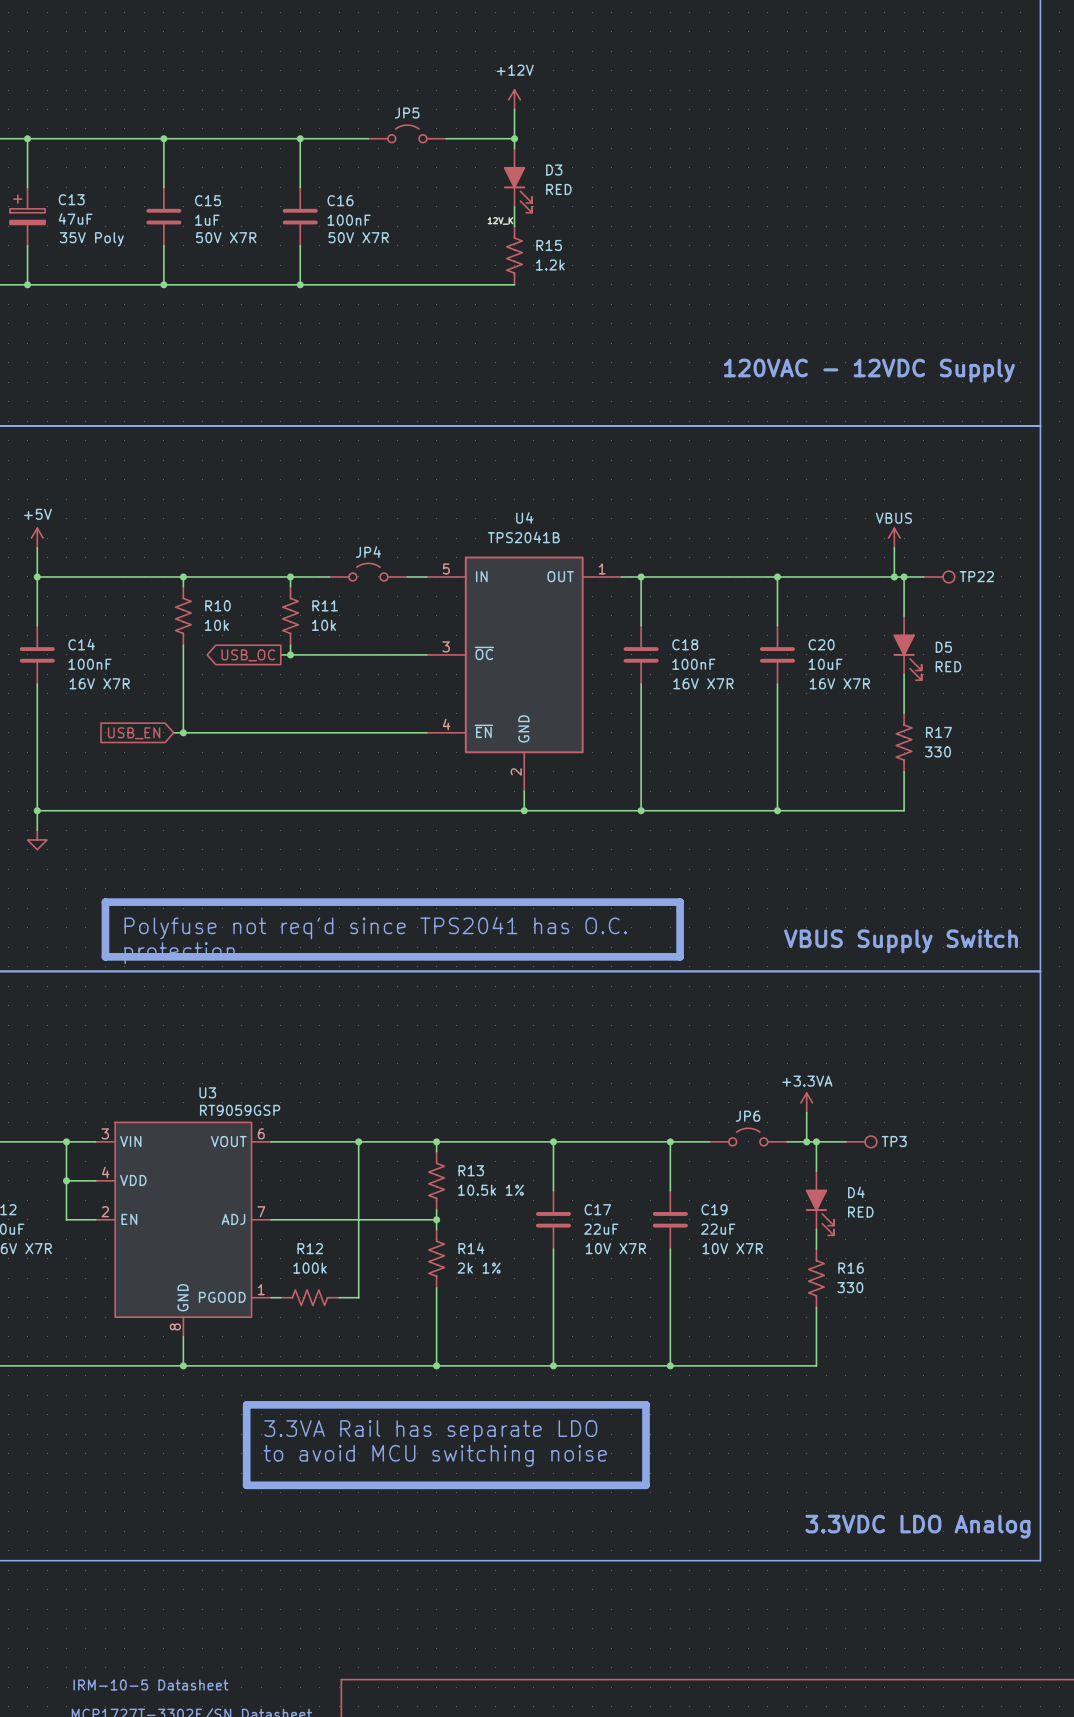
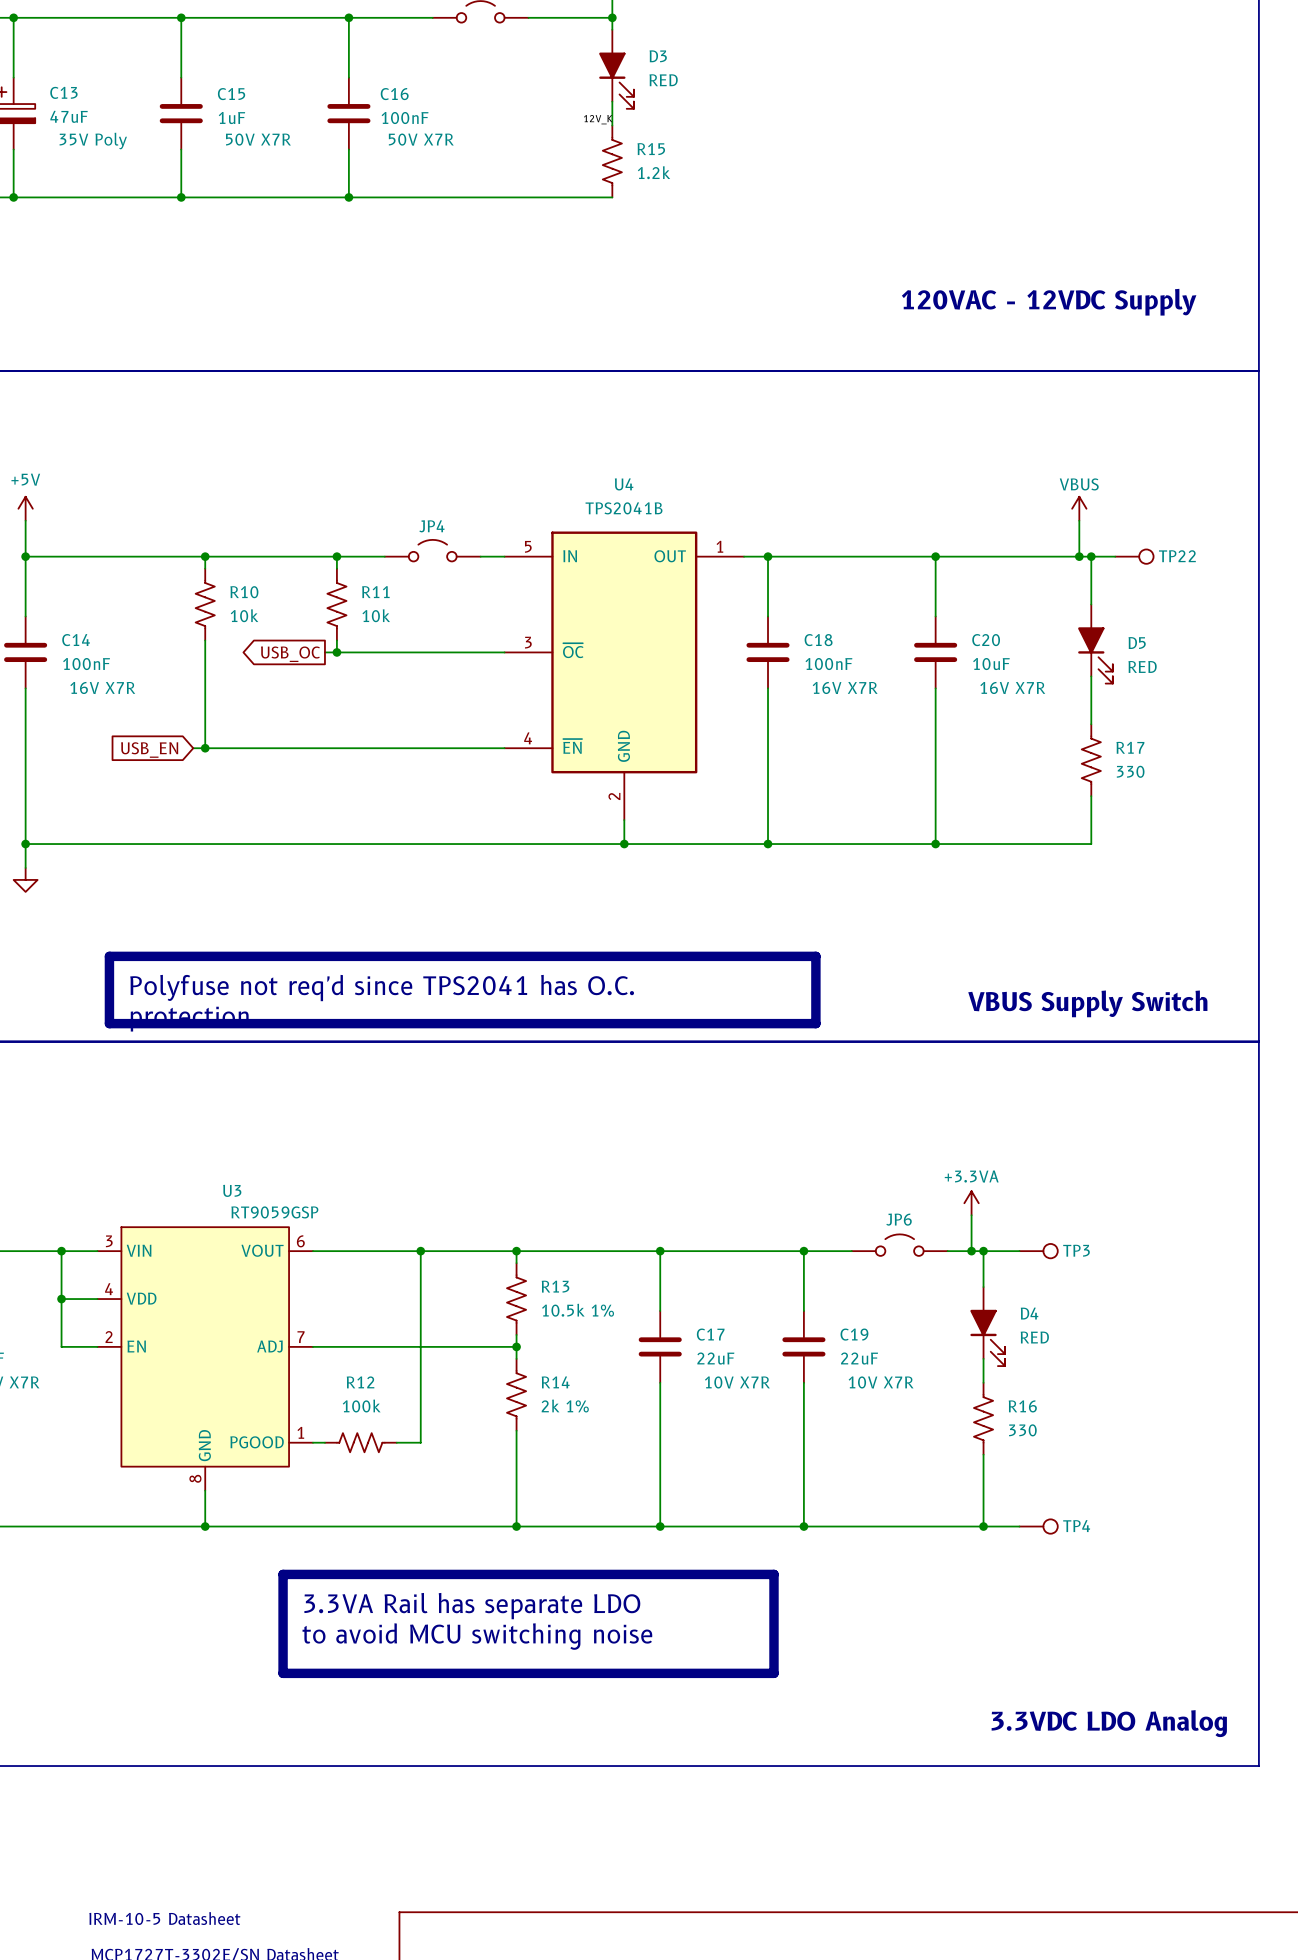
wire: none -> (983, 1526) (1019, 1526)
junction: none -> (983, 1526)
TP4: none -> (1038, 1526)

